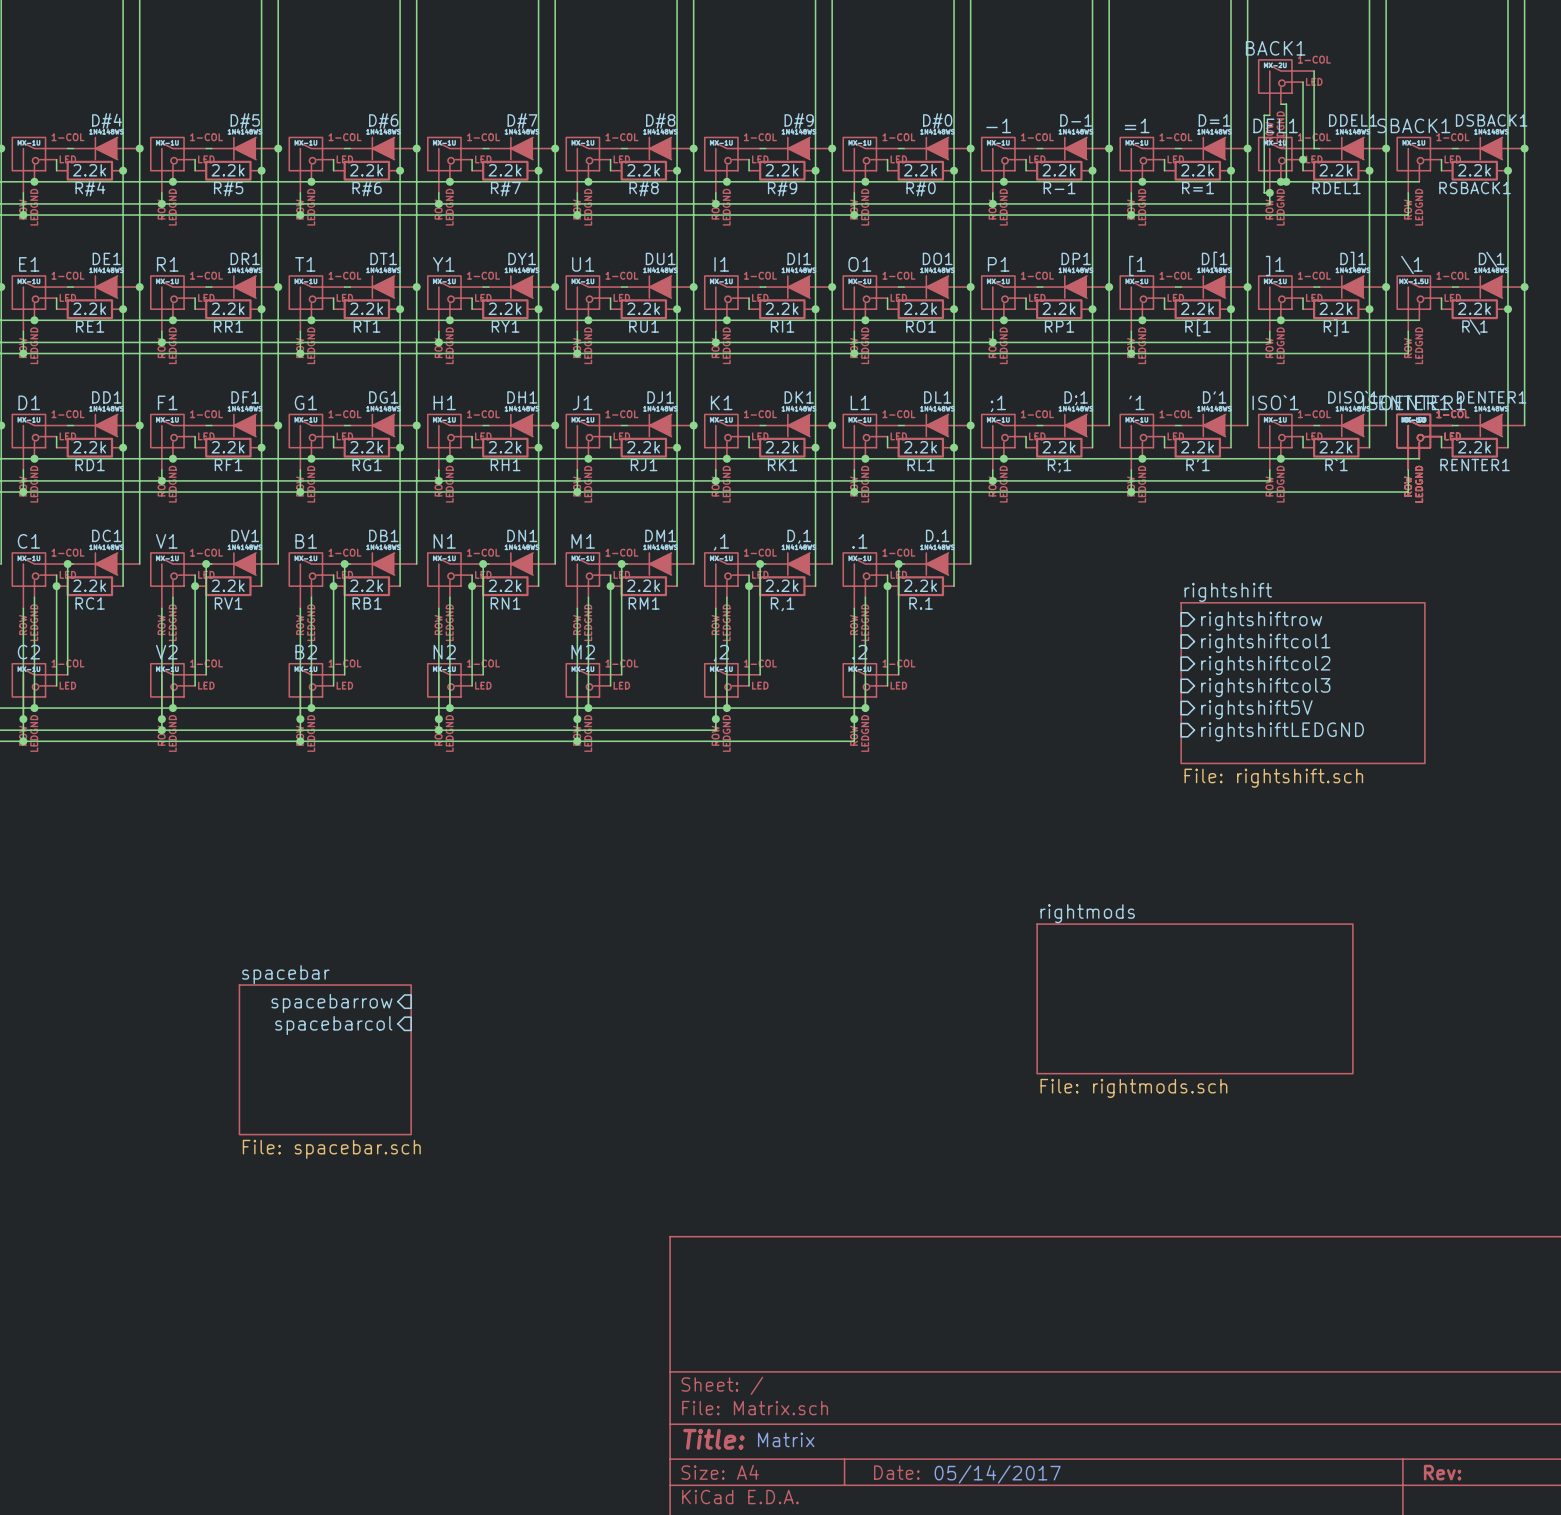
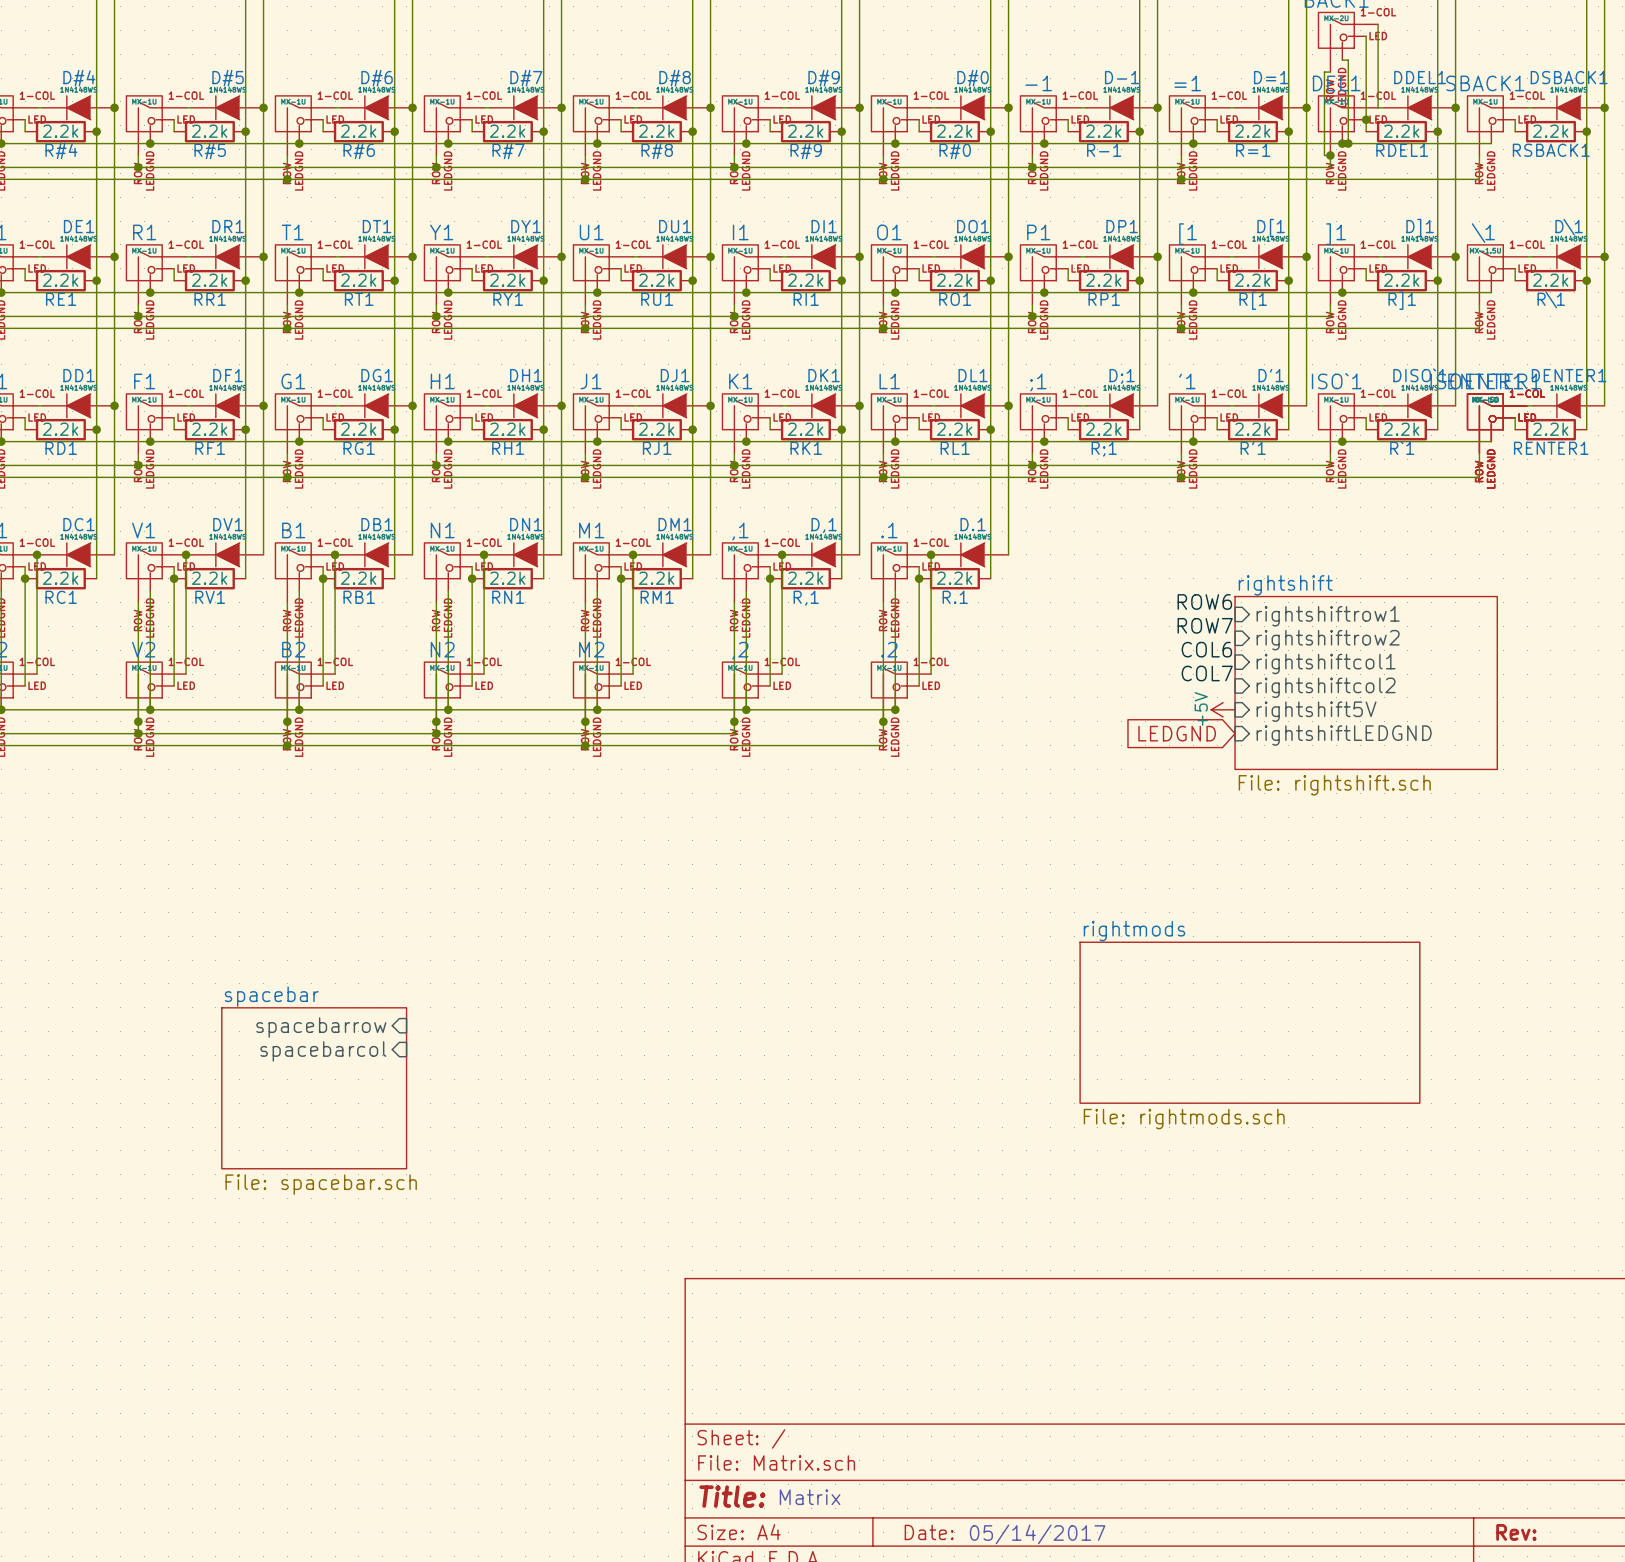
label: none -> ROW6 (1204, 601)
sheet pin: rightshiftrow (1261, 621) -> rightshiftrow1 (1328, 616)
label: none -> ROW7 (1205, 625)
sheet pin: rightshiftcol1 (1265, 643) -> rightshiftrow2 (1328, 640)
label: none -> COL6 (1206, 649)
sheet pin: rightshiftcol2 (1265, 665) -> rightshiftcol1 (1326, 663)
label: none -> COL7 (1207, 673)
sheet pin: rightshiftcol3 (1265, 687) -> rightshiftcol2 (1326, 687)
power symbol: none -> +5V (1223, 709)
global label: none -> LEDGND (1177, 733)

